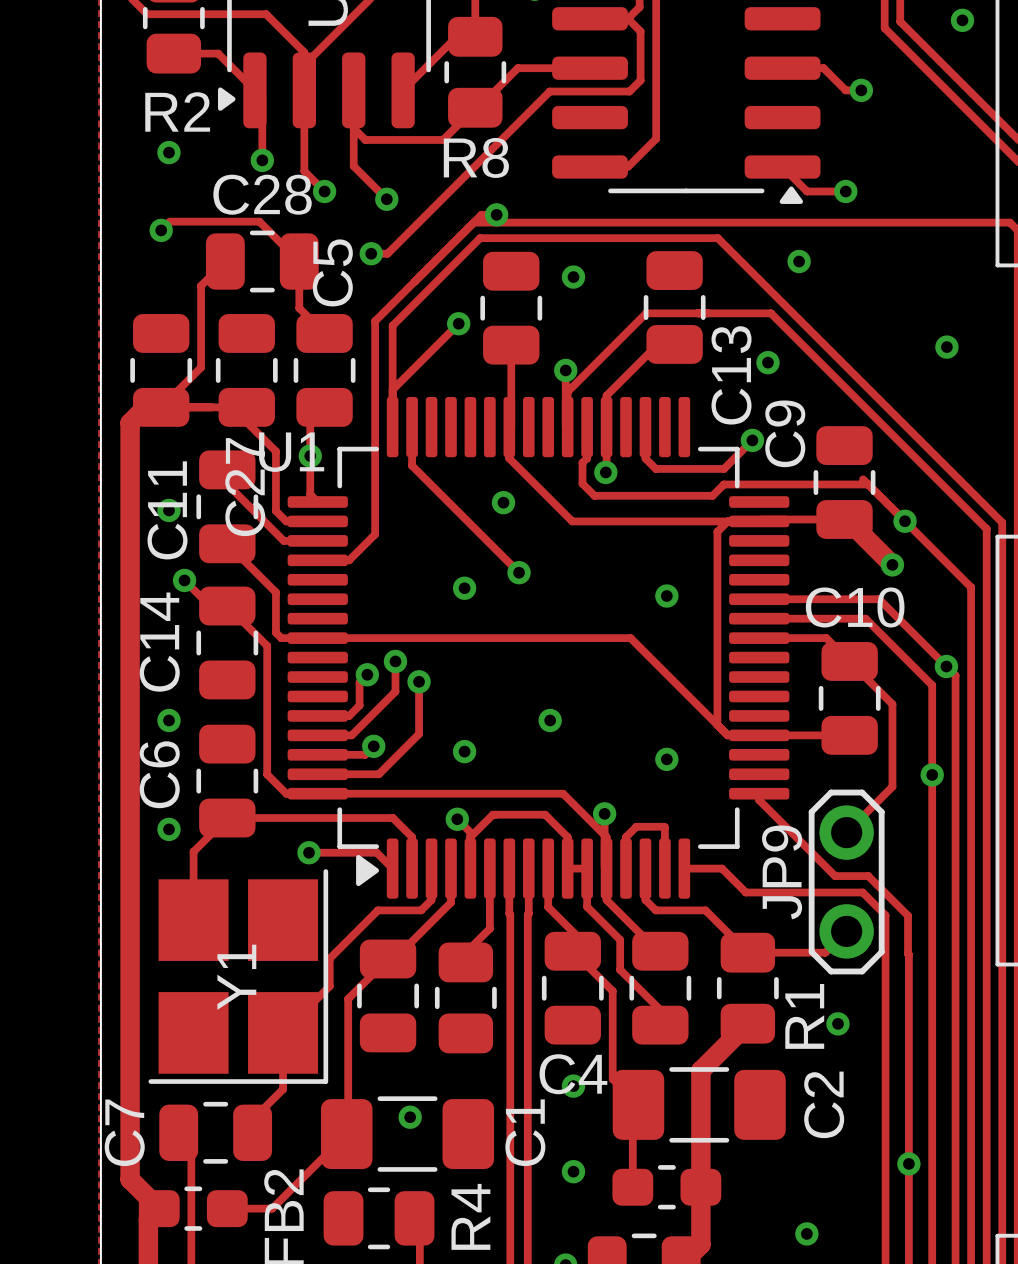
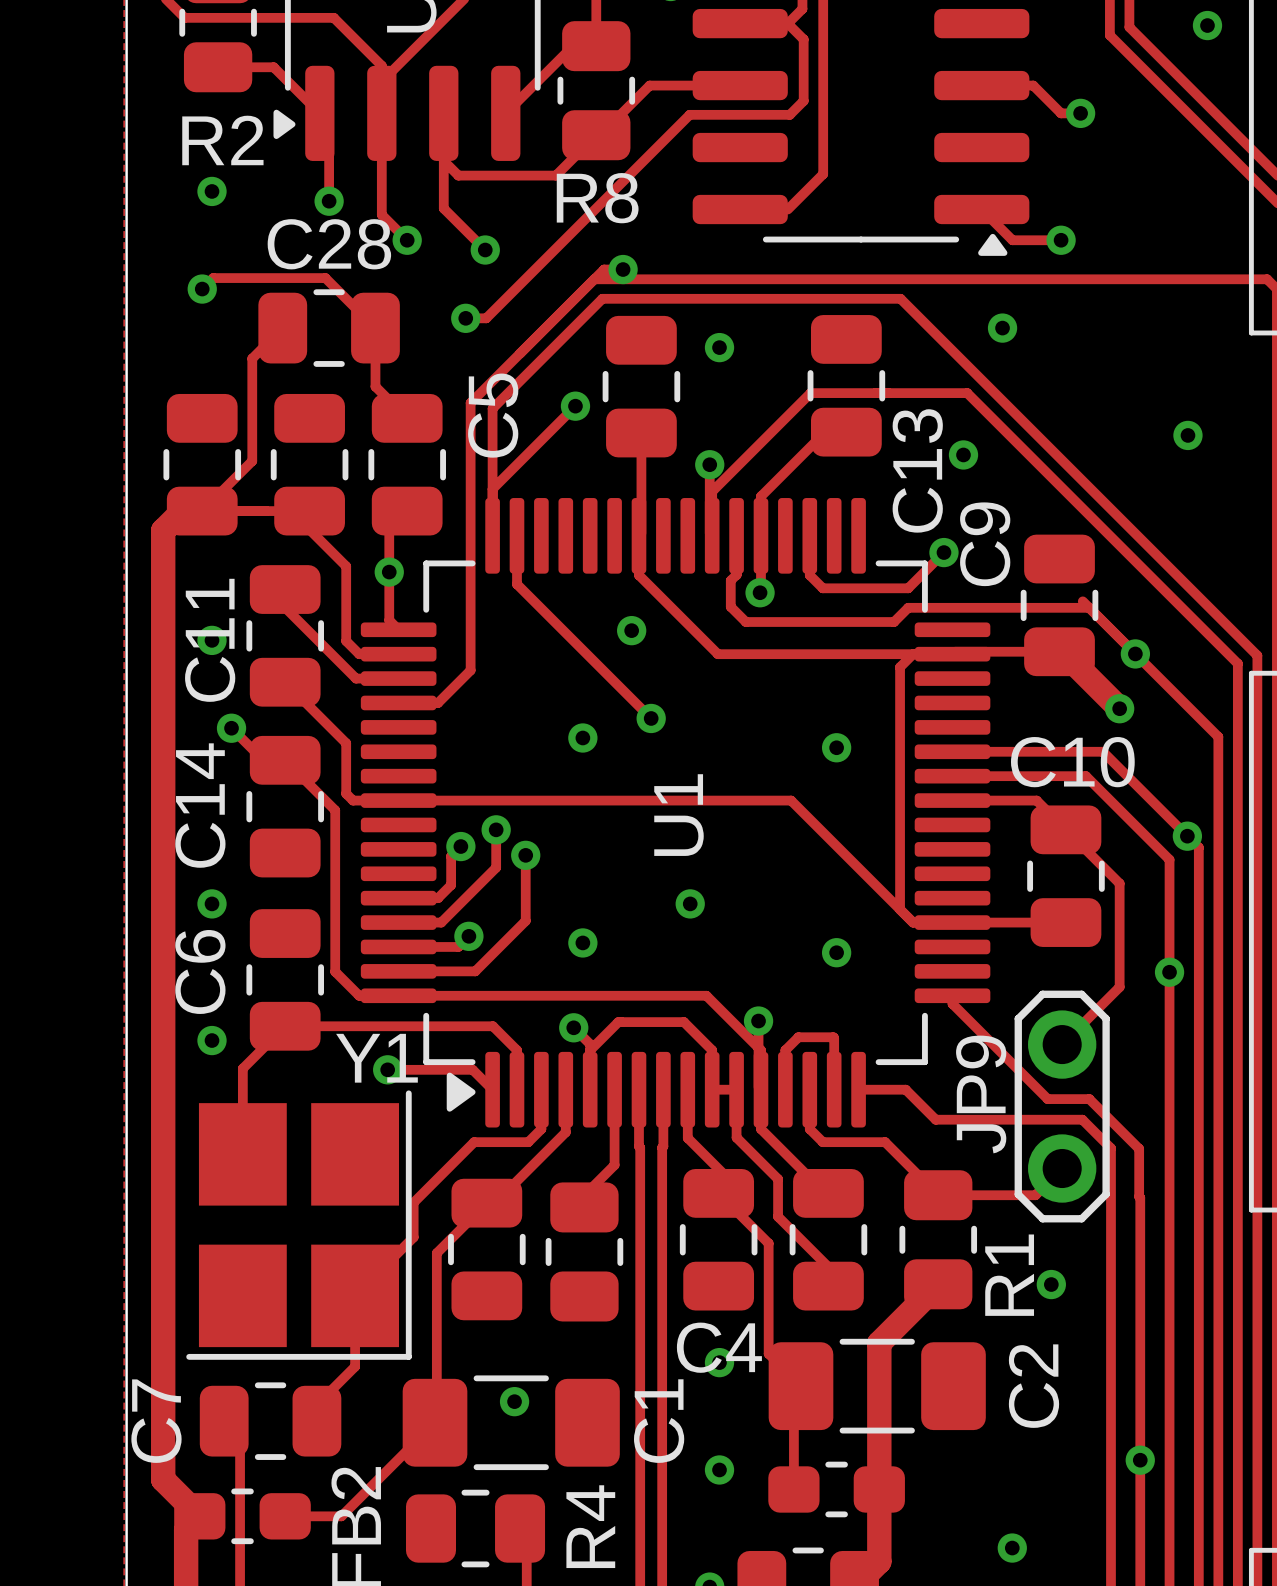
C5 name position: C5 (332, 272) -> C5 (493, 415)
U1 name rotation: 0° (291, 452) -> 90° counterclockwise (678, 815)
U1 name position: U1 (291, 452) -> U1 (678, 815)
C27 name: C27 (245, 487) -> none
Y1 name rotation: 0° (236, 977) -> 90° clockwise (376, 1058)
Y1 name position: Y1 (236, 977) -> Y1 (376, 1058)

